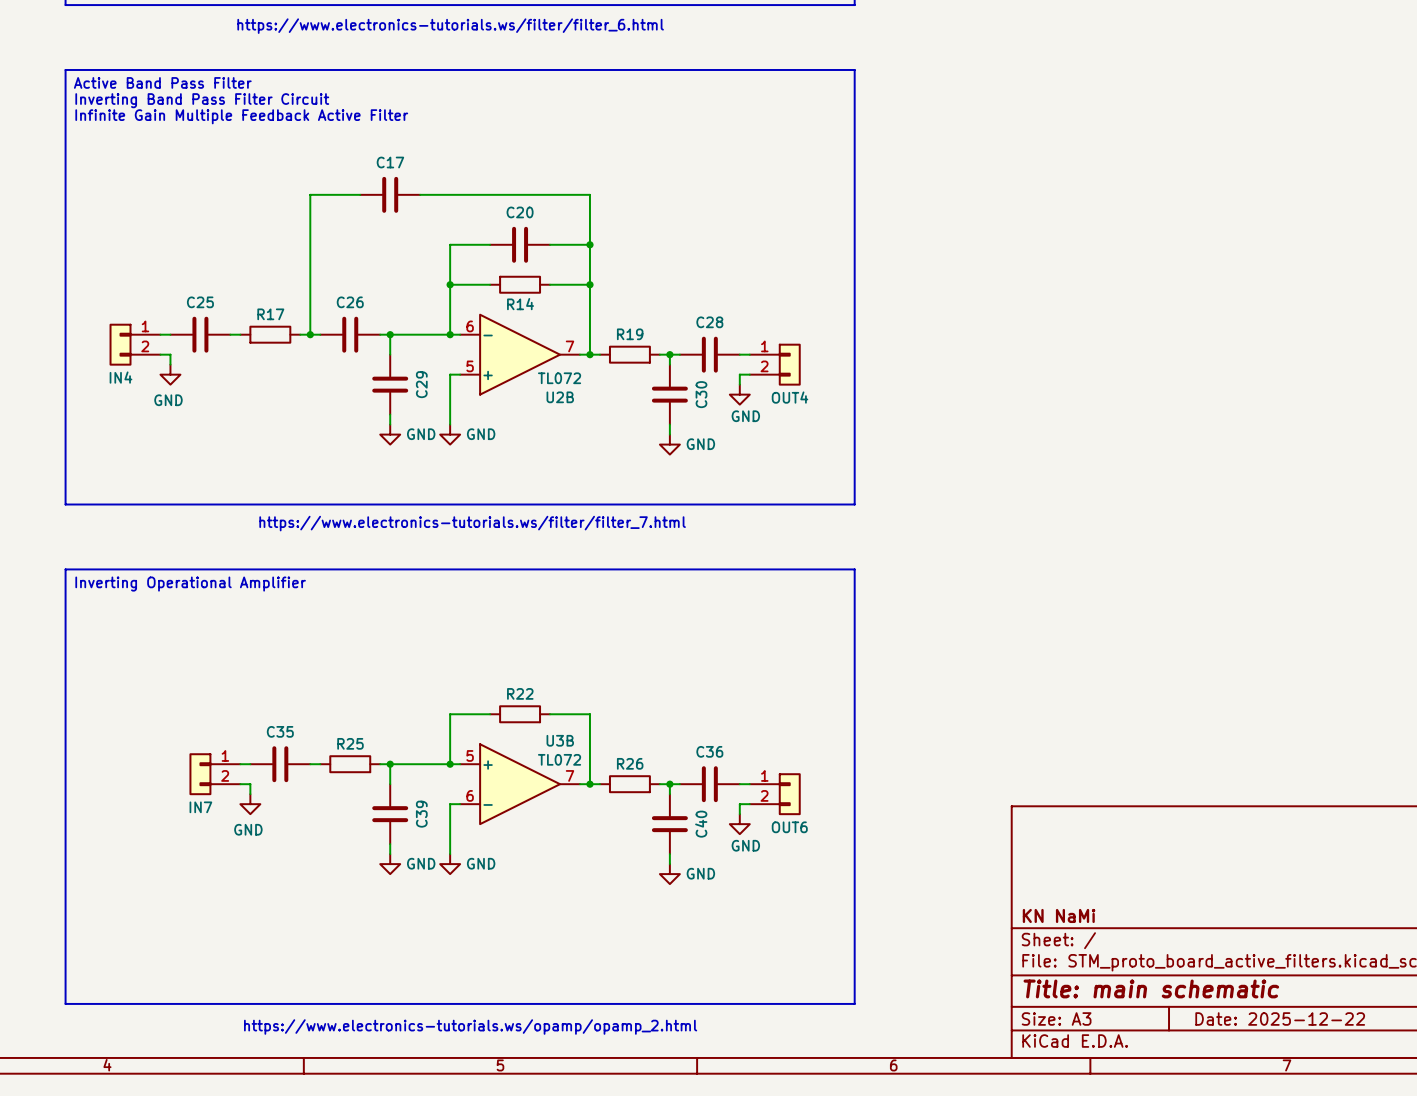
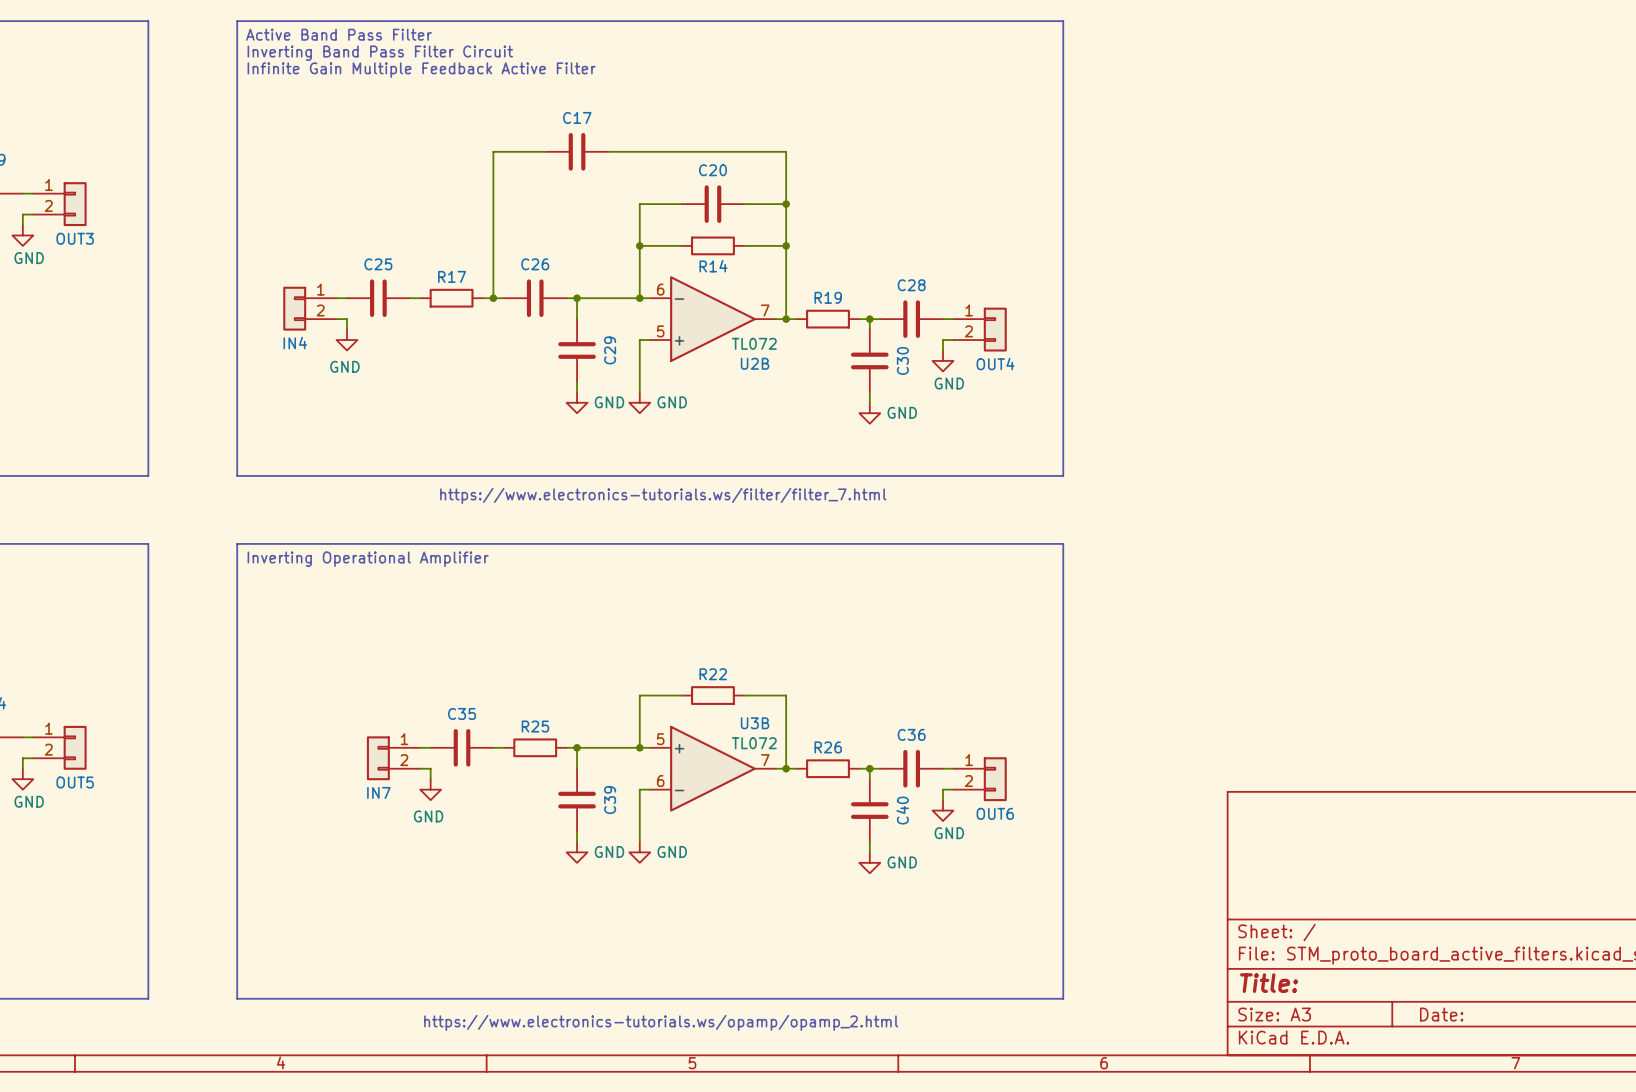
title block: KN NaMi (1059, 915) -> none
title block: Title: main schematic (1151, 988) -> Title: (1269, 983)
title block: Date: 2025-12-22 (1280, 1018) -> Date: (1441, 1014)

